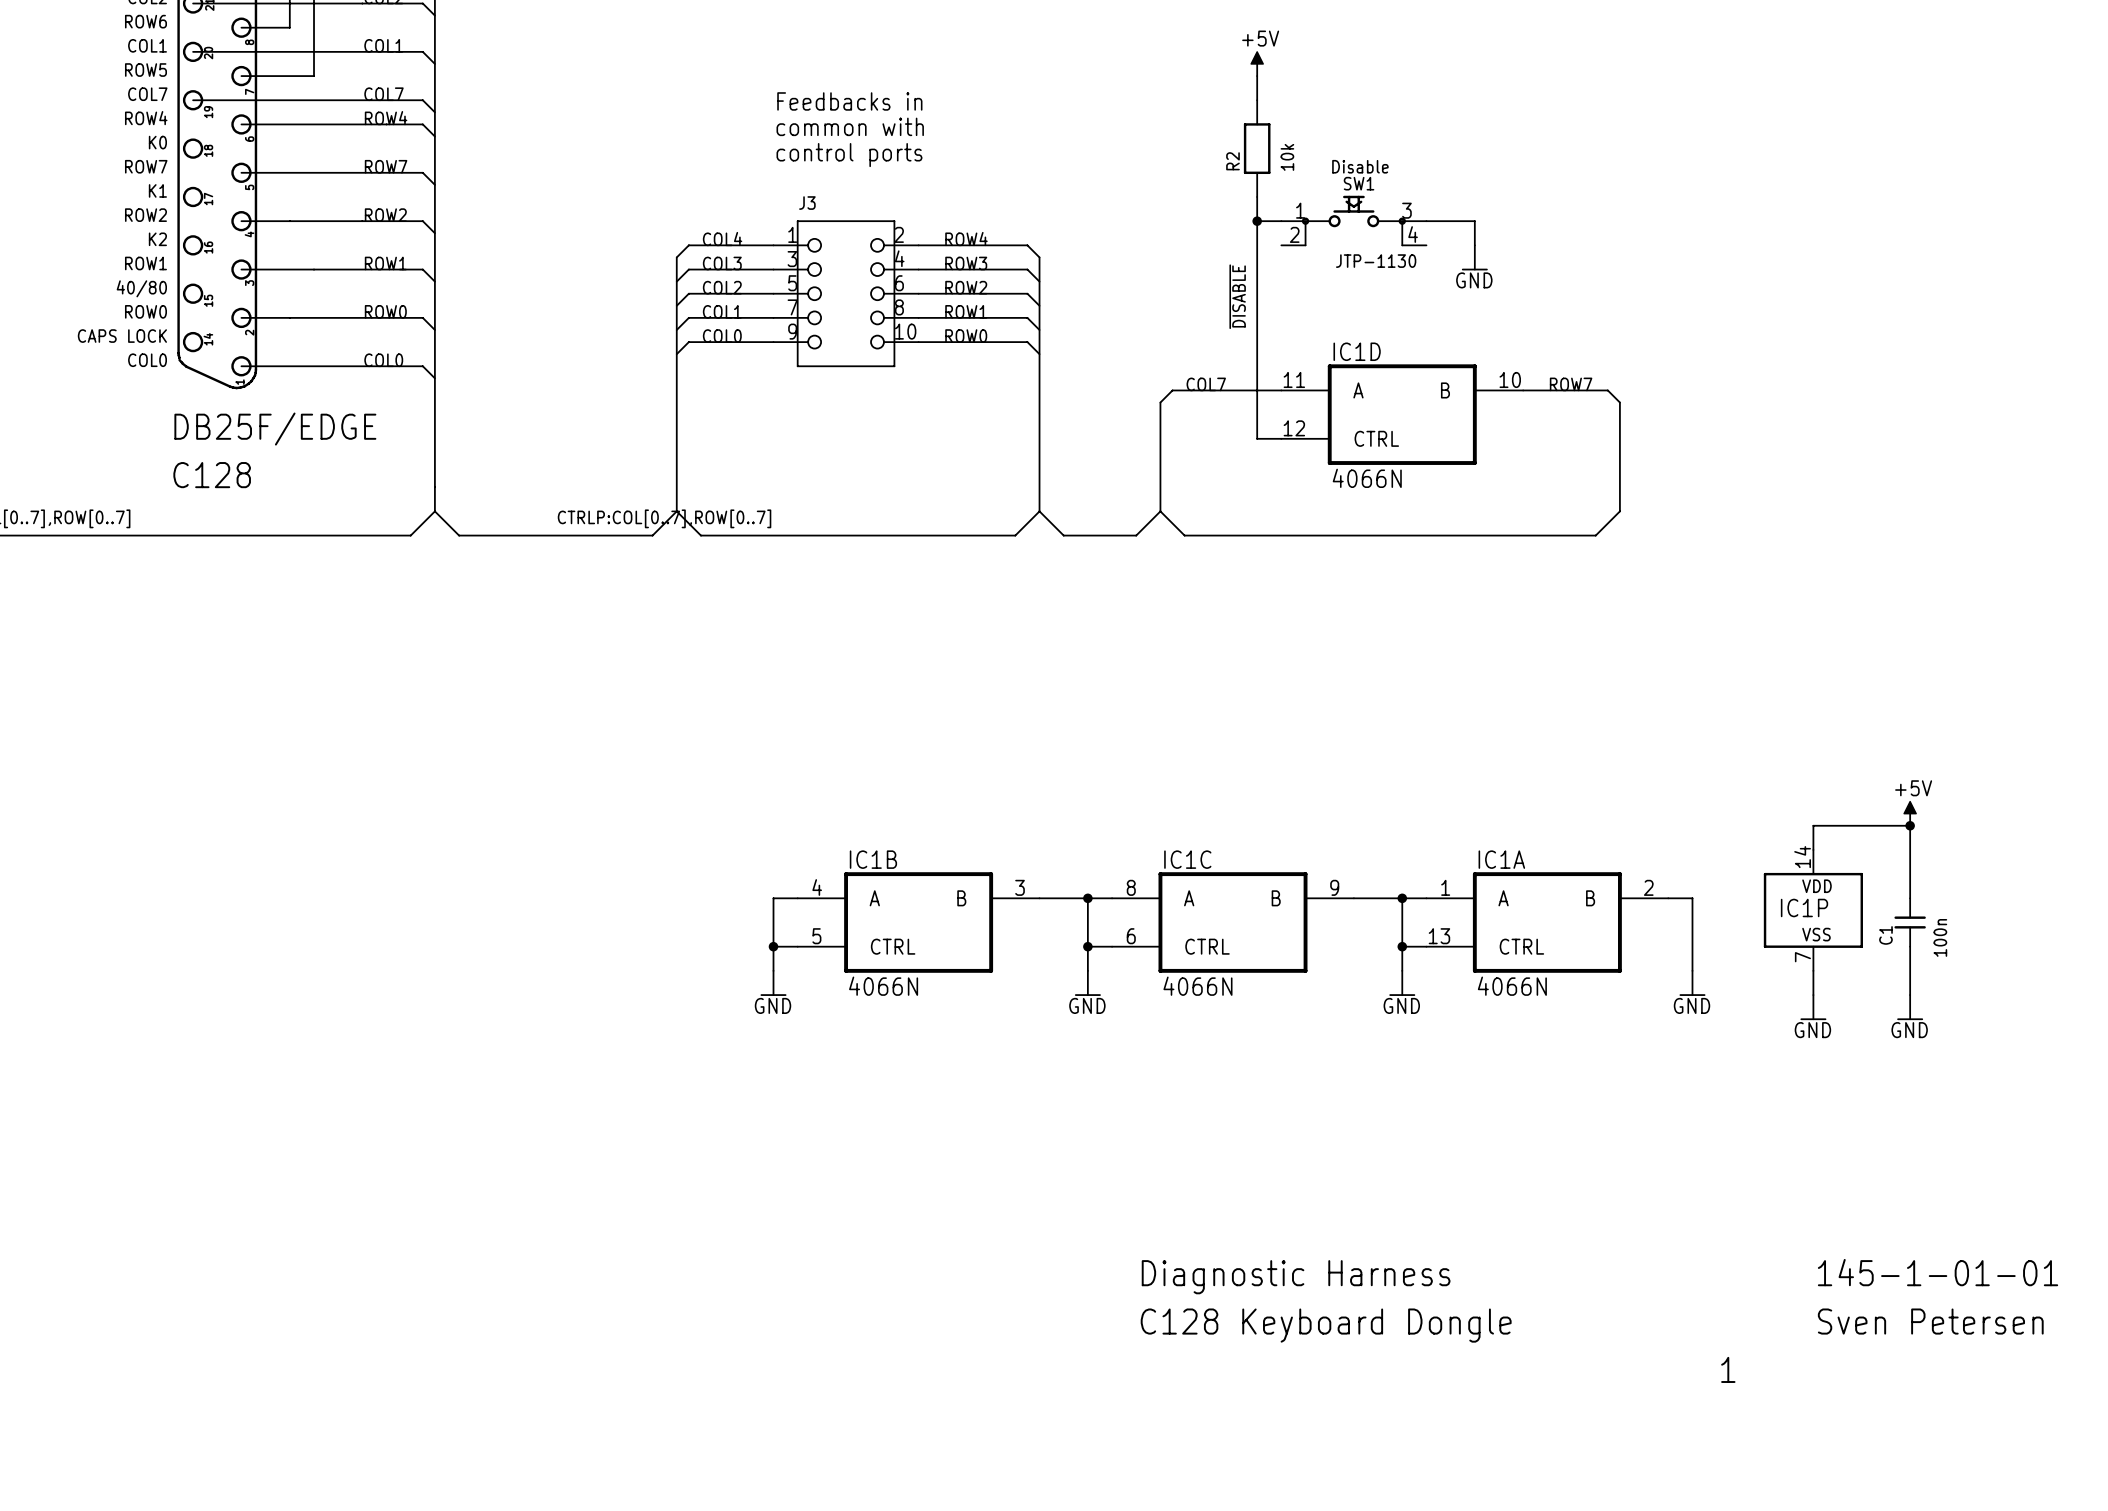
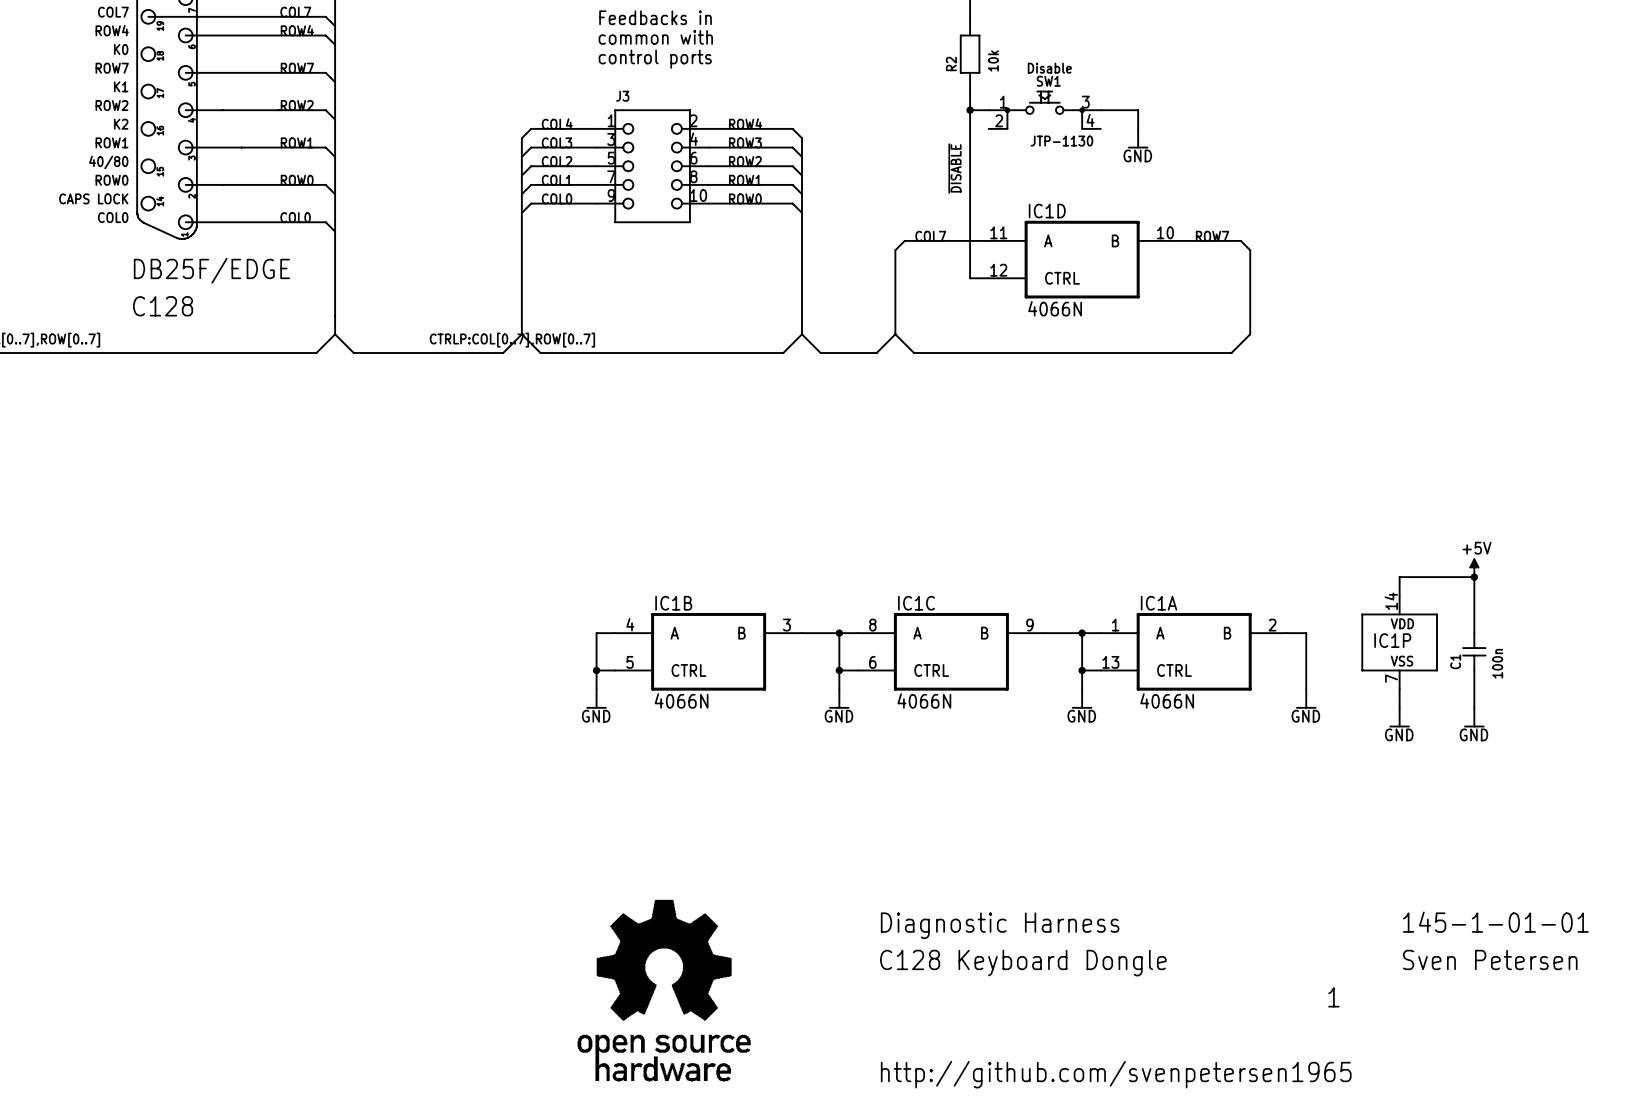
part: none -> (664, 990)
text: none -> http://github.com/svenpetersen1965 (1116, 1074)

